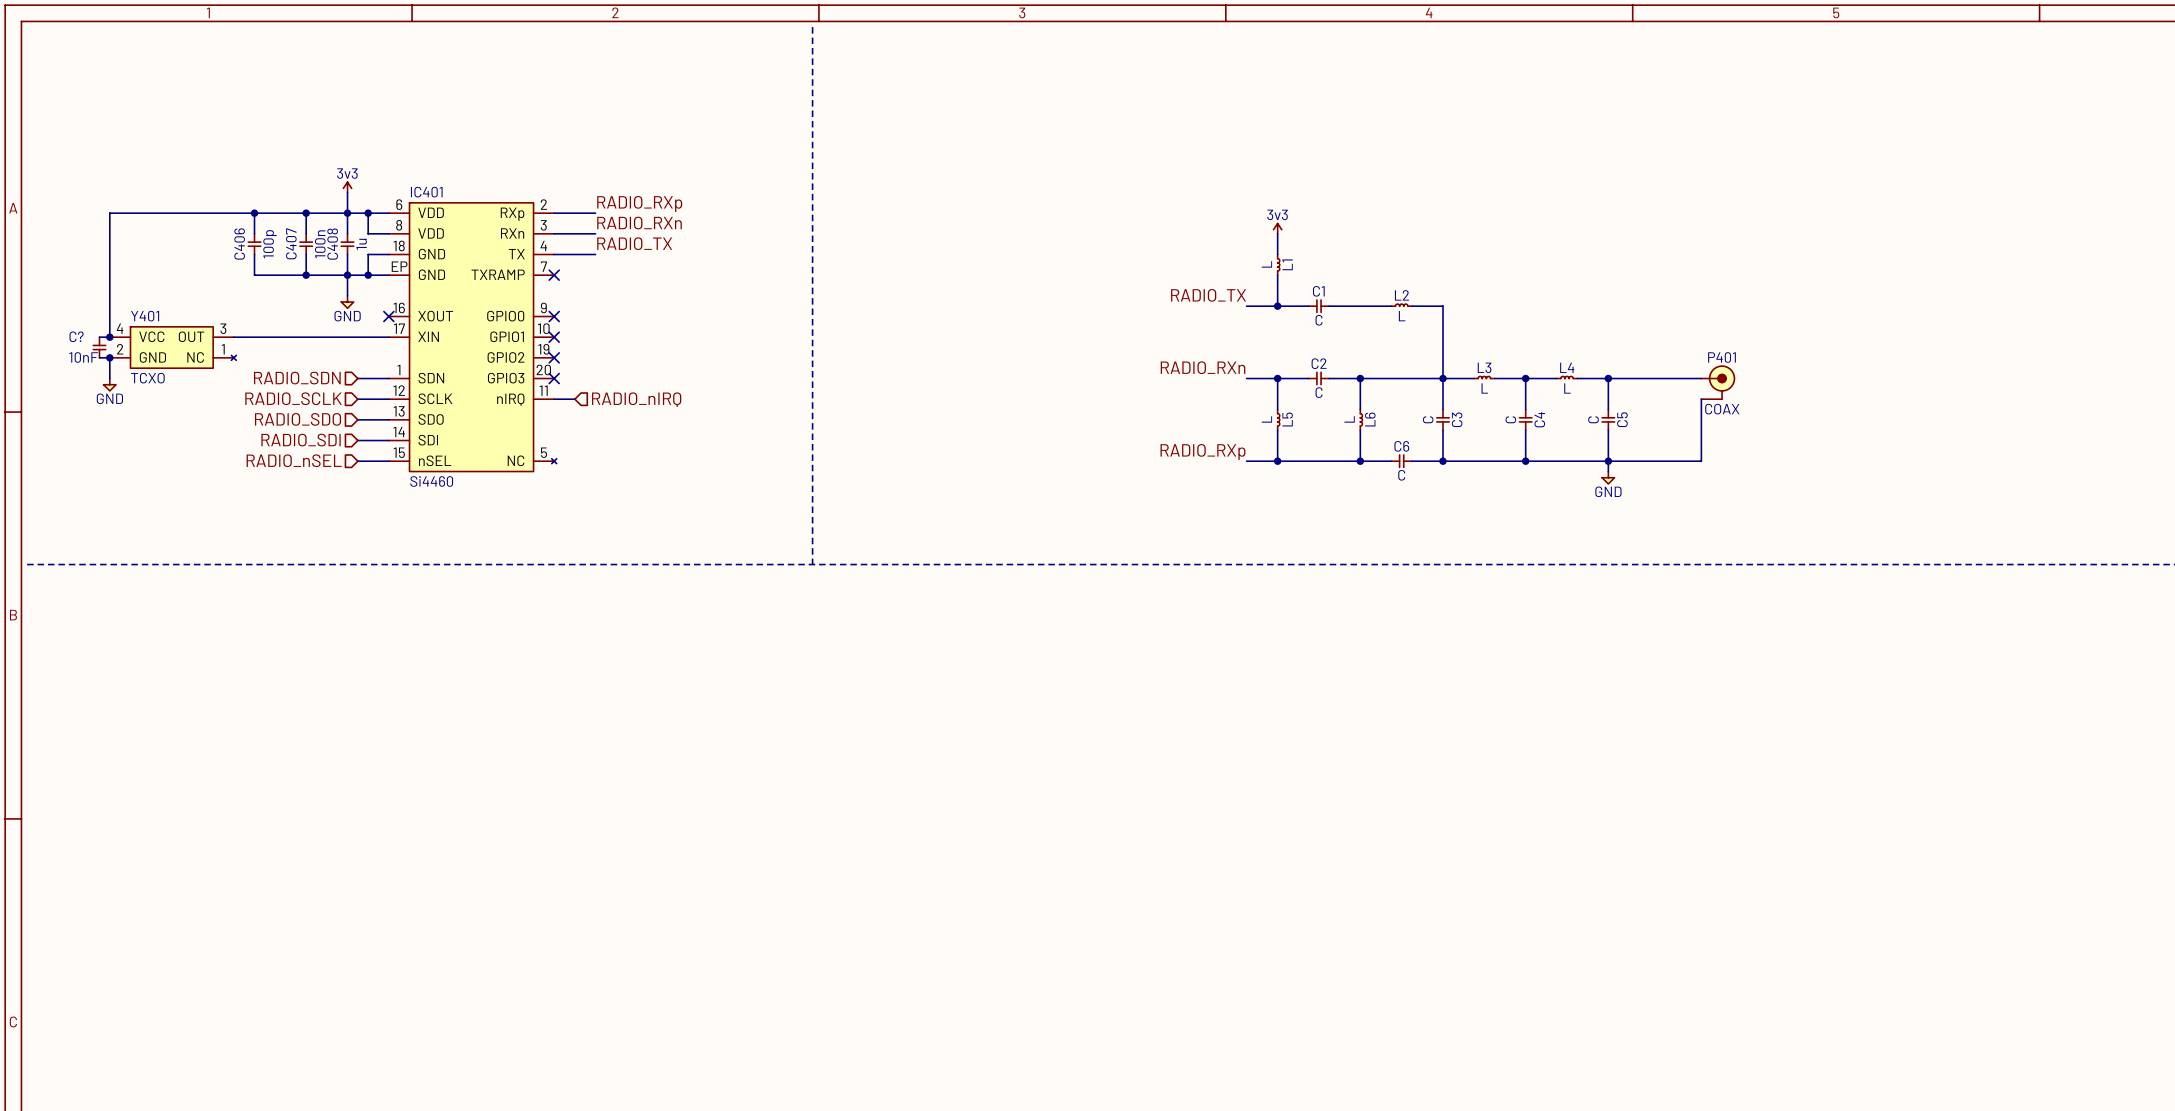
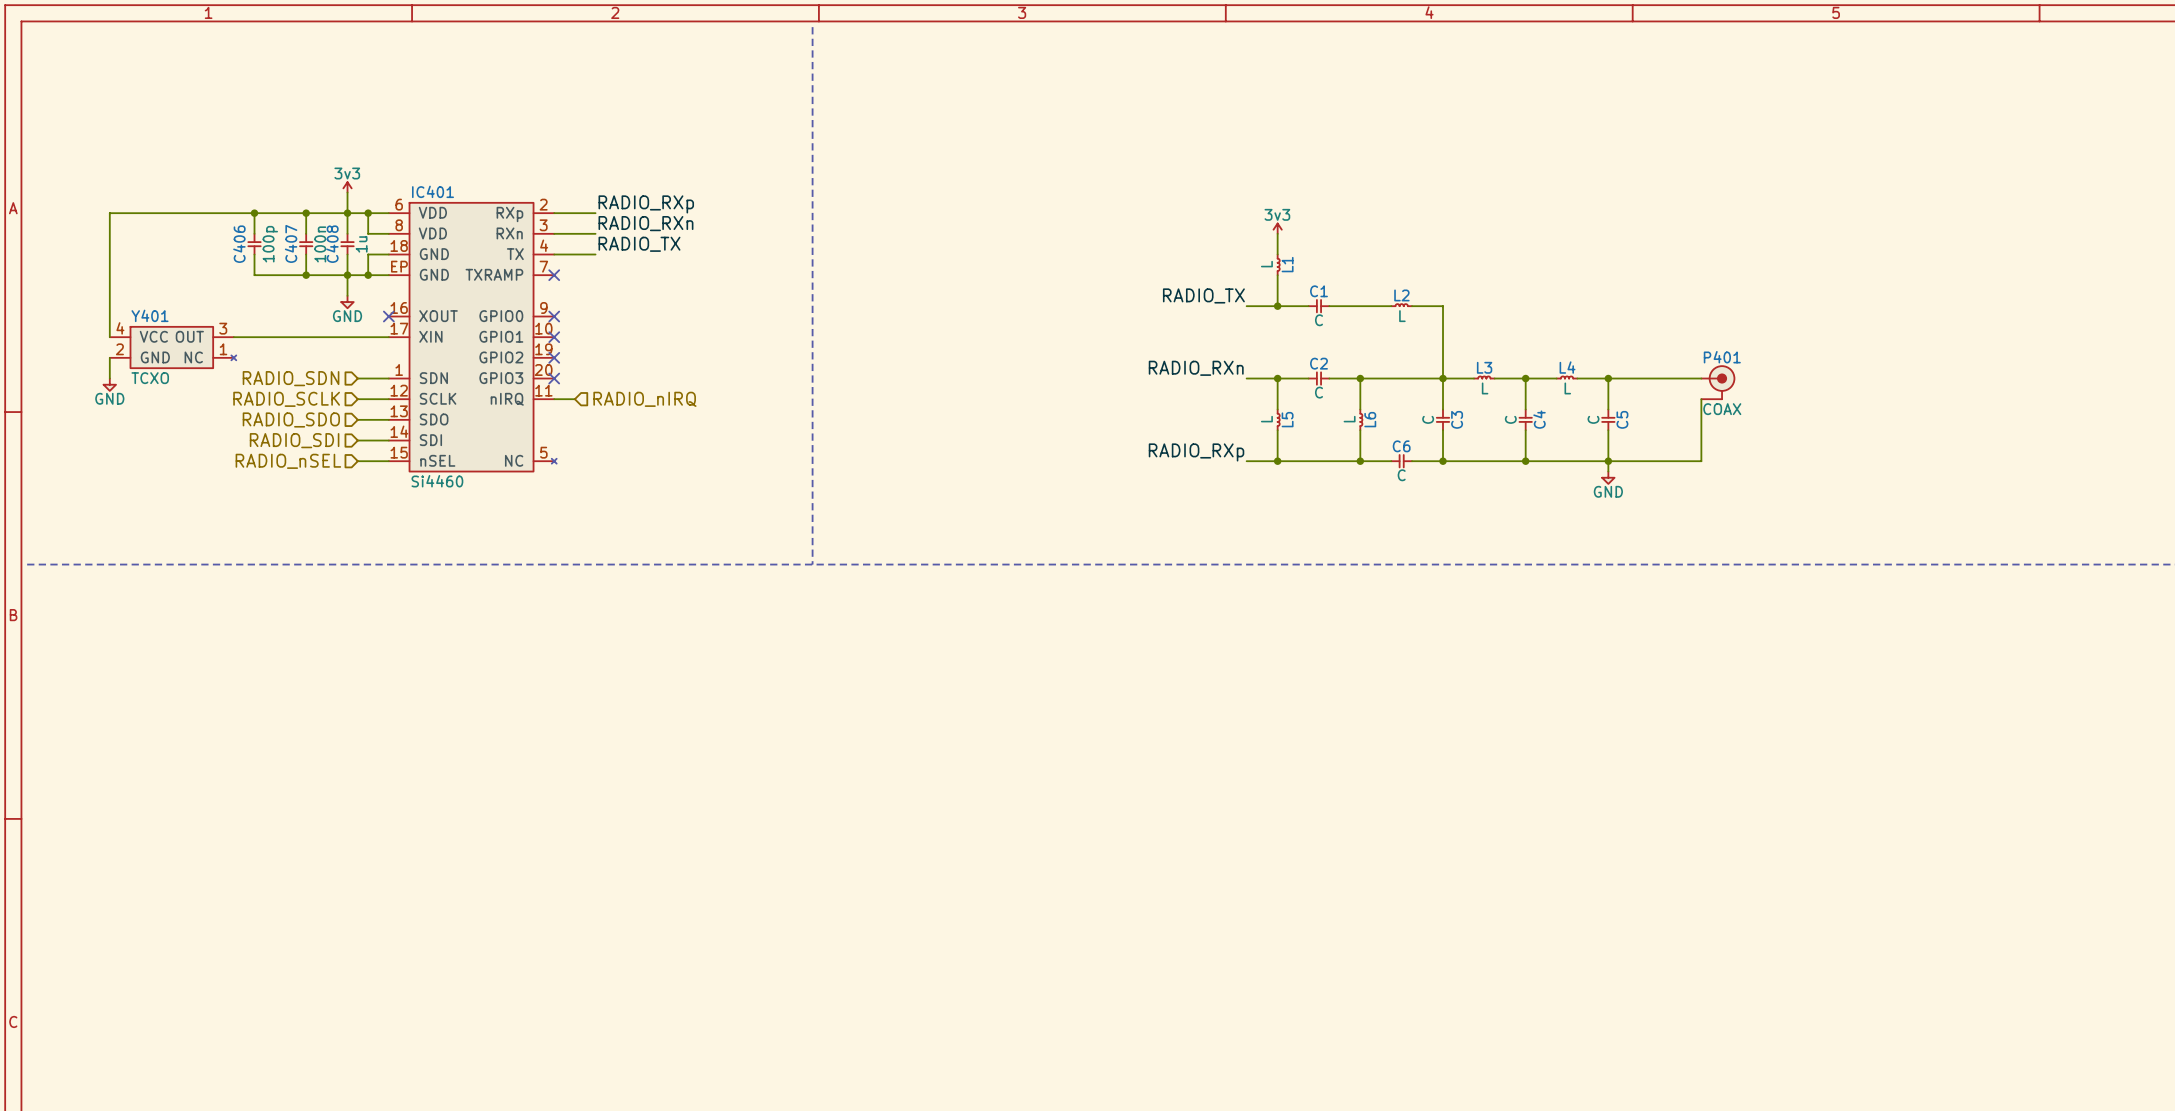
wire: (99, 337) (109, 337) -> none
junction: (109, 337) -> none
C?: 10nF (99, 347) -> none
wire: (99, 357) (109, 357) -> none
junction: (109, 357) -> none

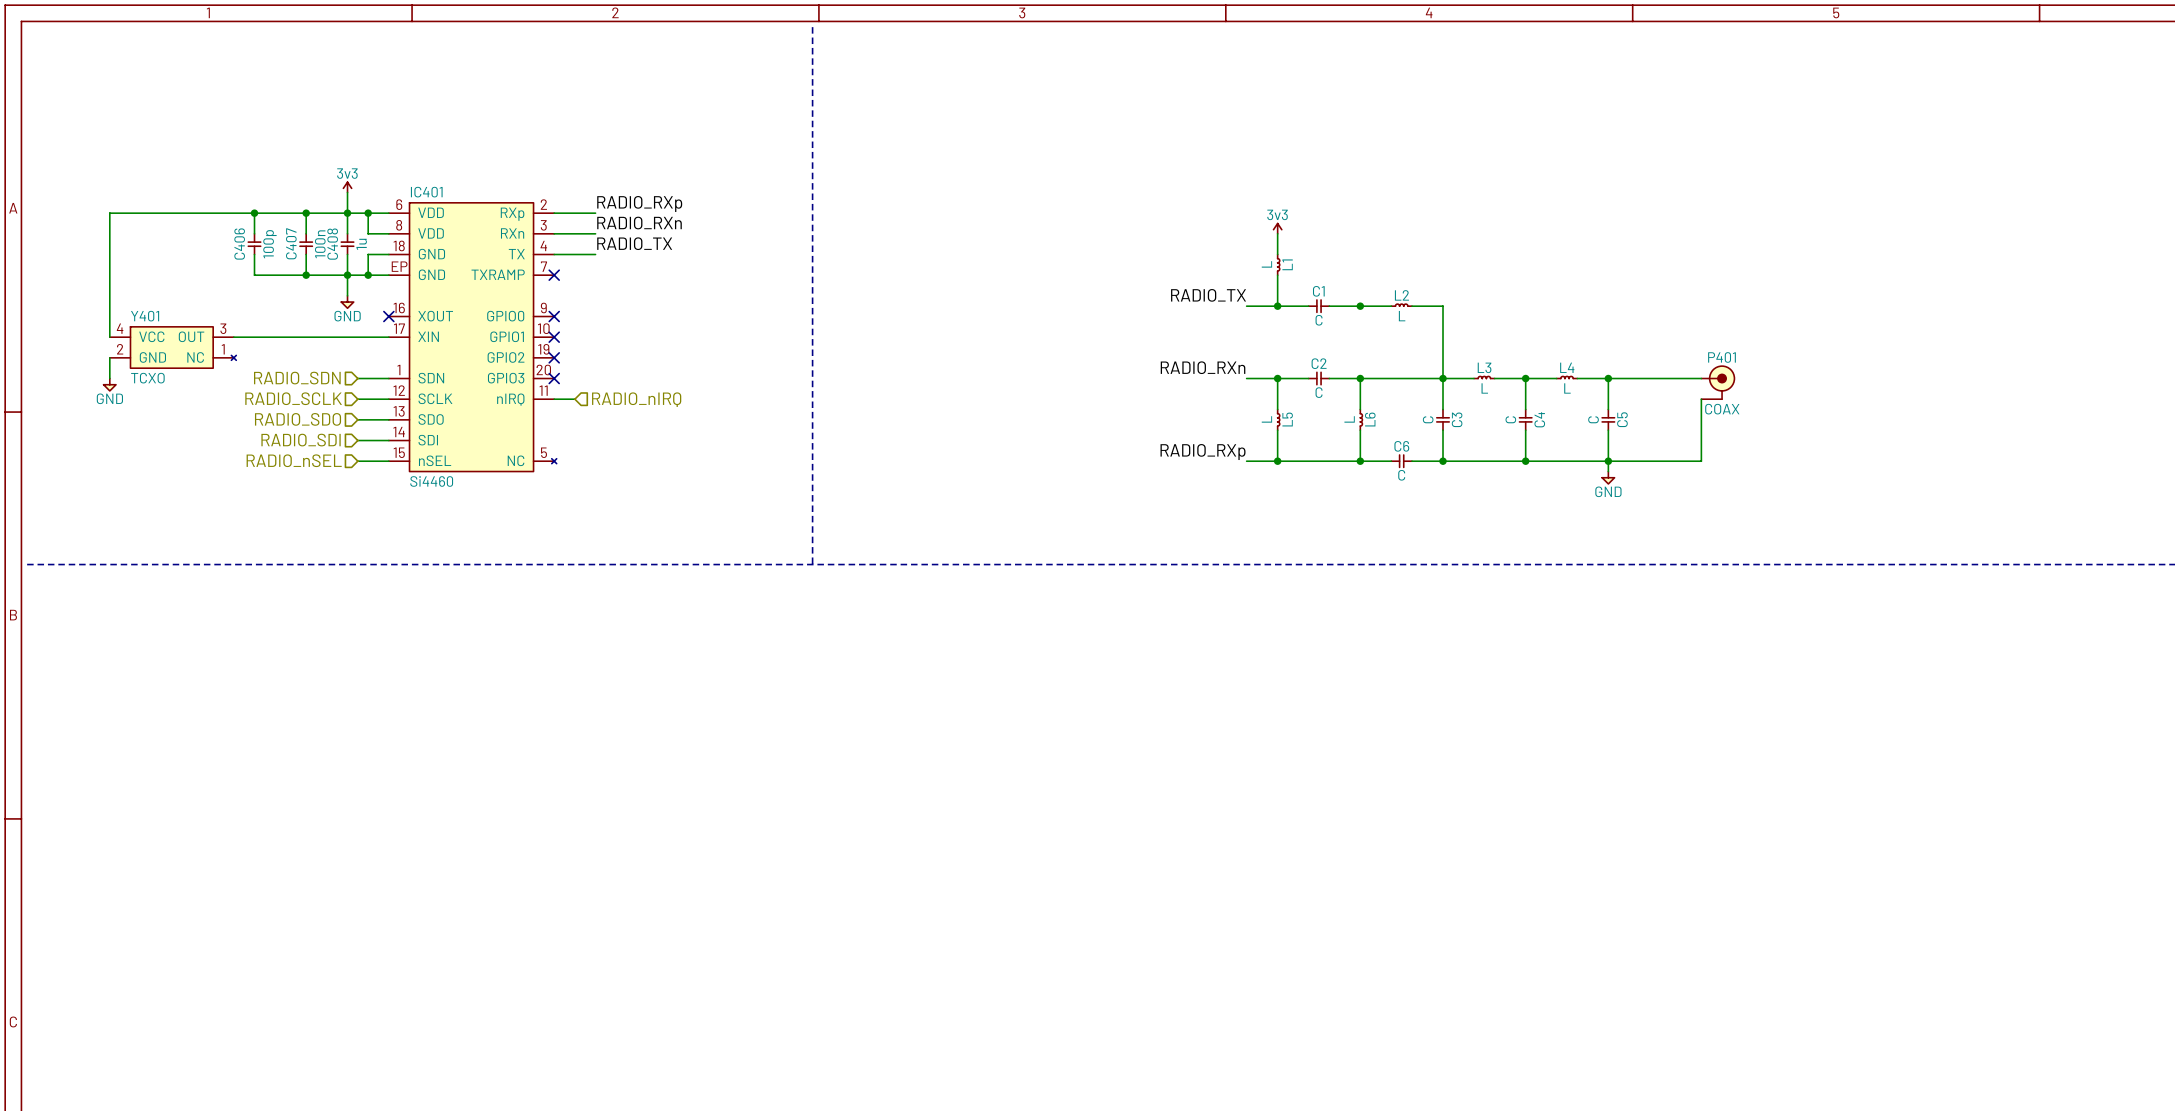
junction: none -> (1360, 306)

